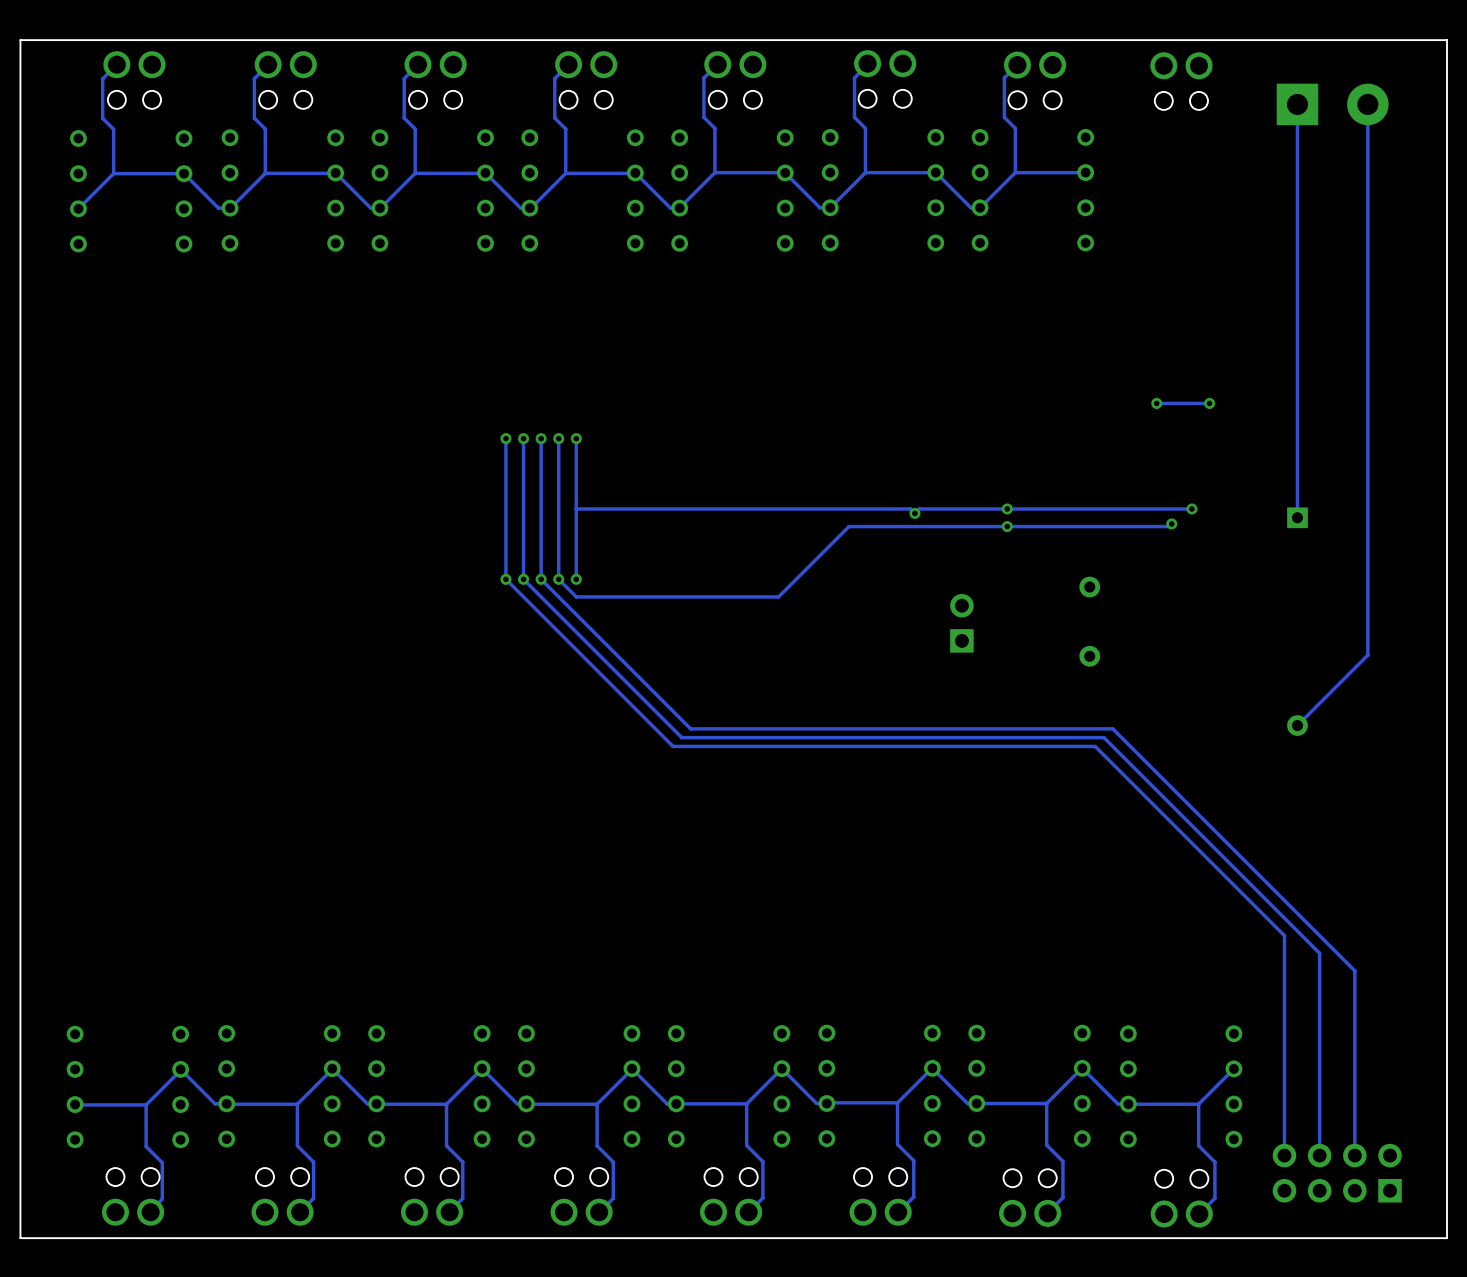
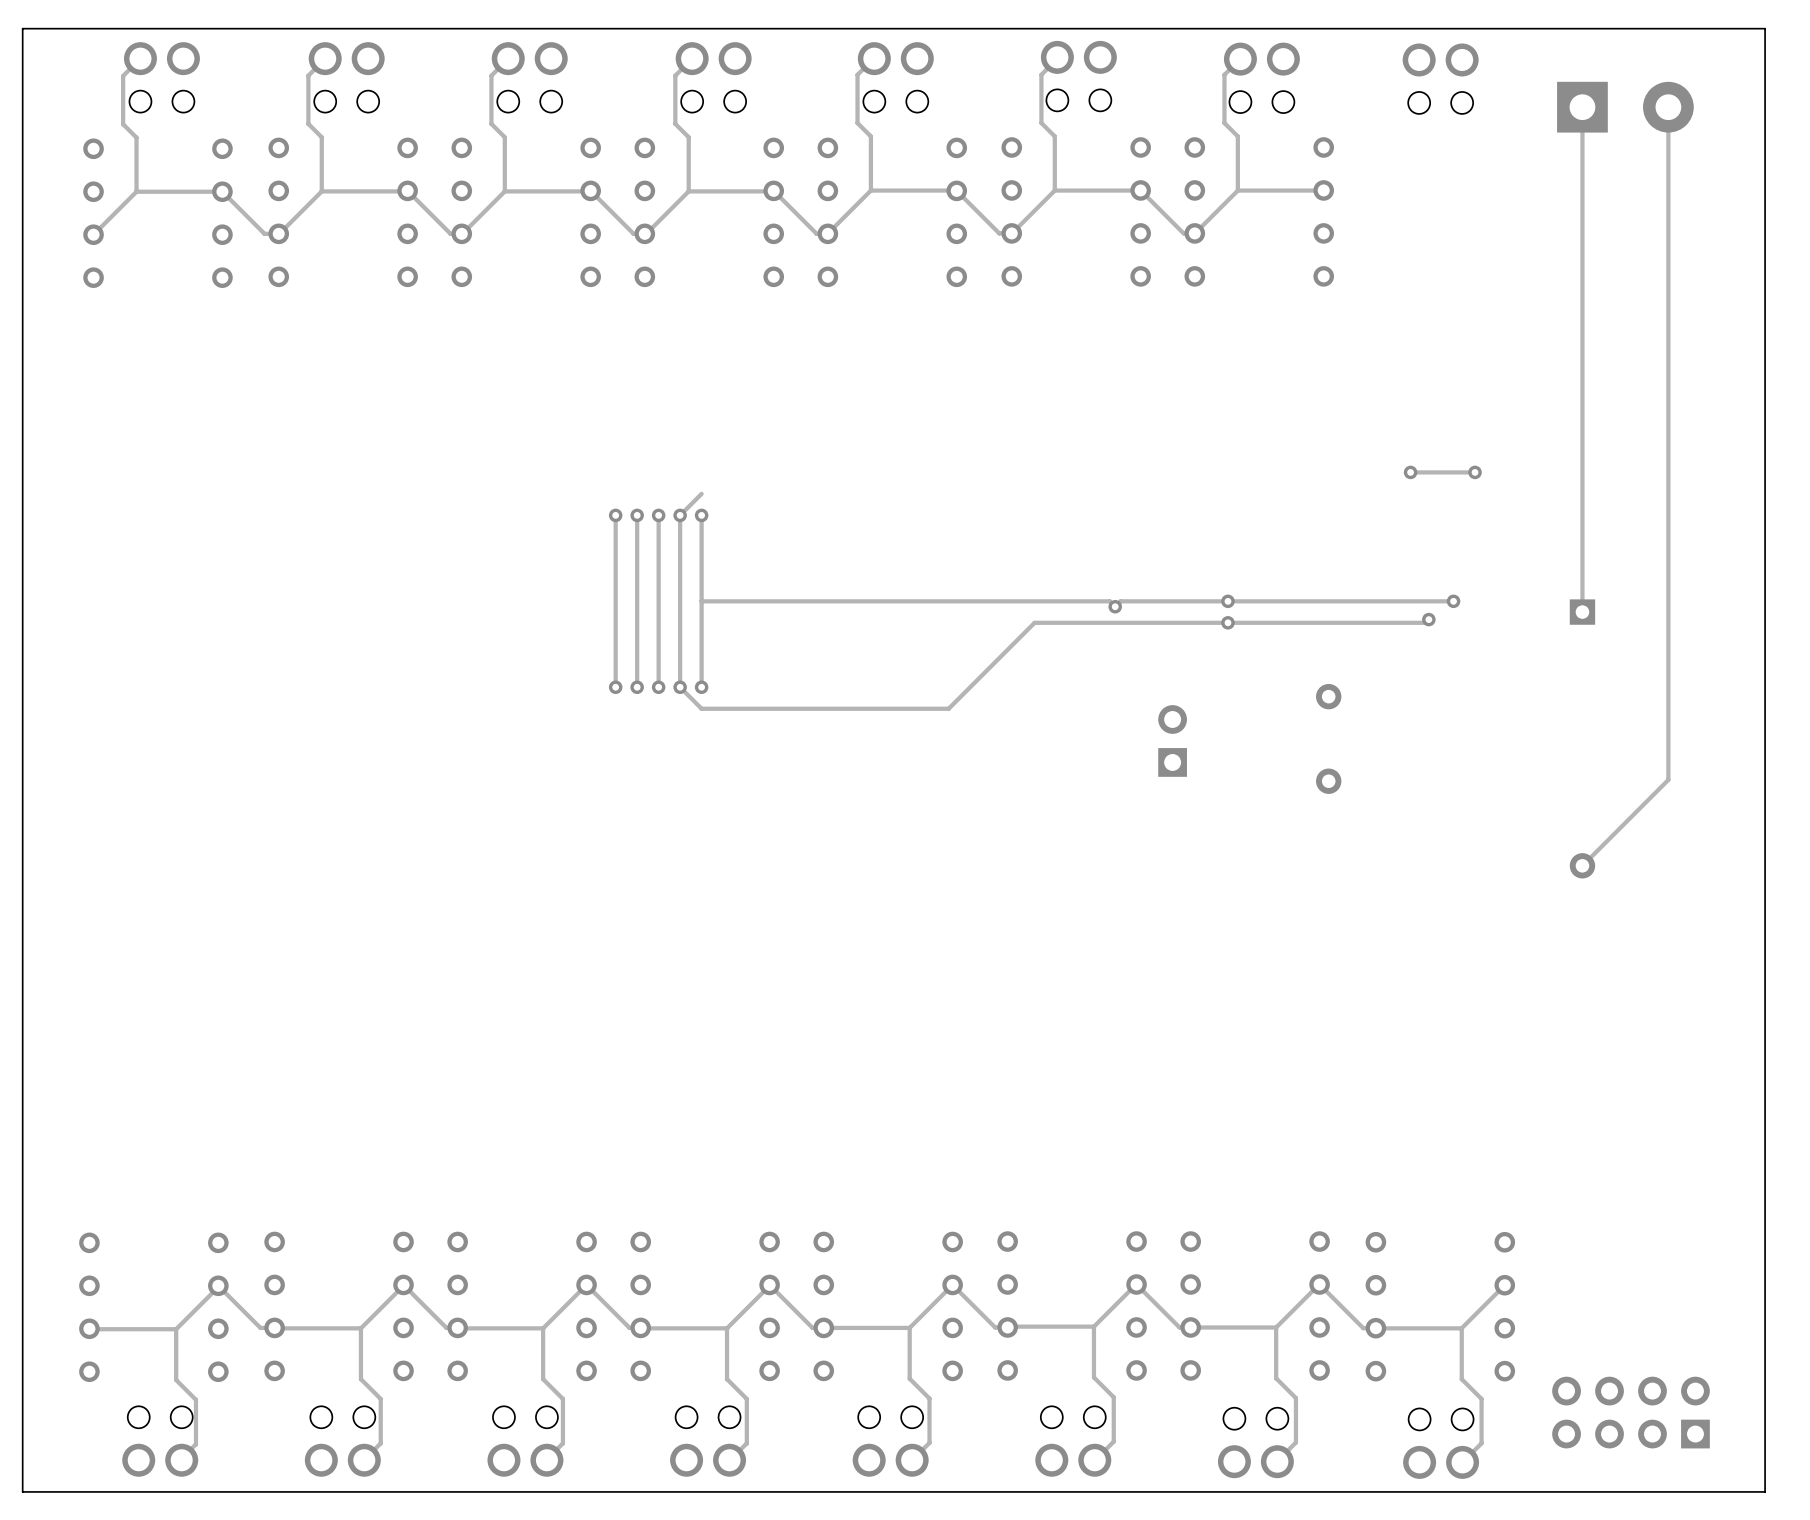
track: none -> (701, 493) (680, 515)
track: (505, 579) (673, 746) (1095, 746) (1284, 935) (1284, 1155) -> none
track: (523, 579) (681, 737) (1104, 737) (1319, 953) (1319, 1155) -> none
track: (541, 579) (690, 728) (1112, 728) (1354, 970) (1354, 1155) -> none

